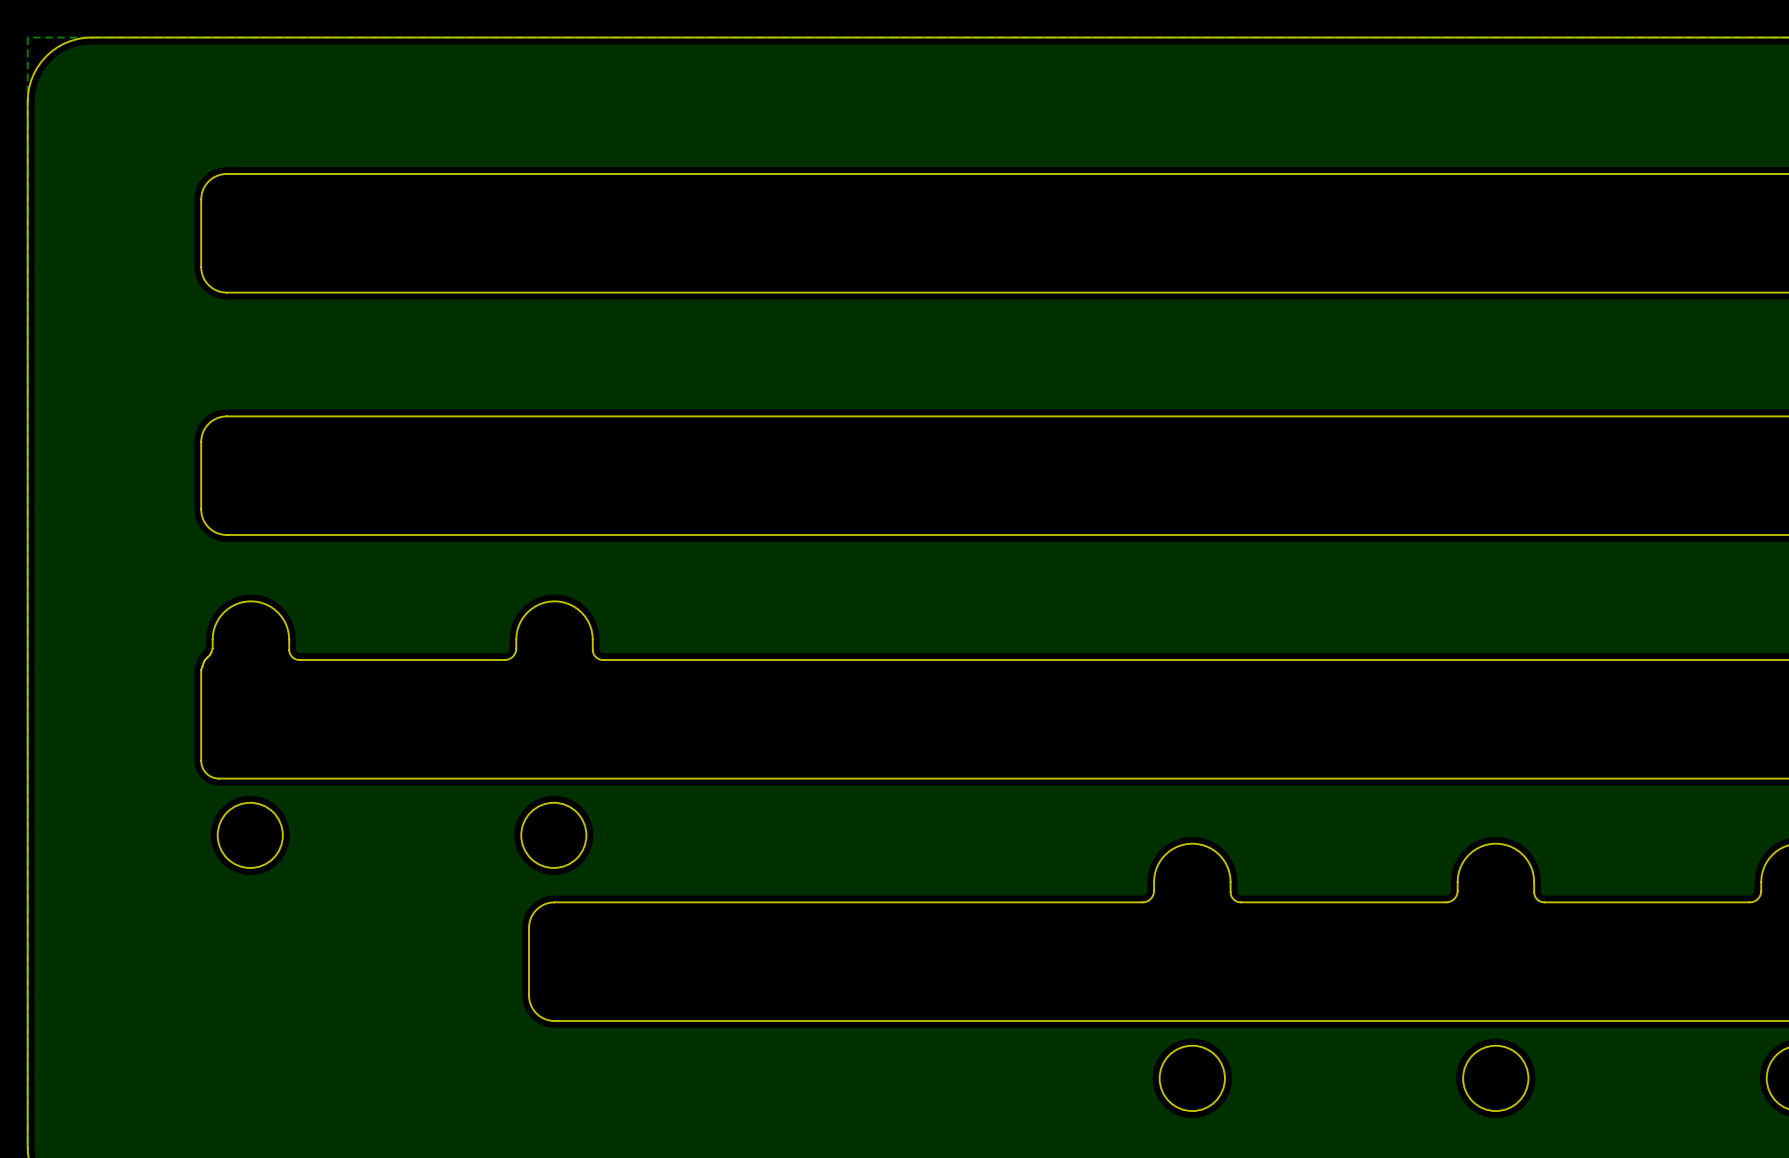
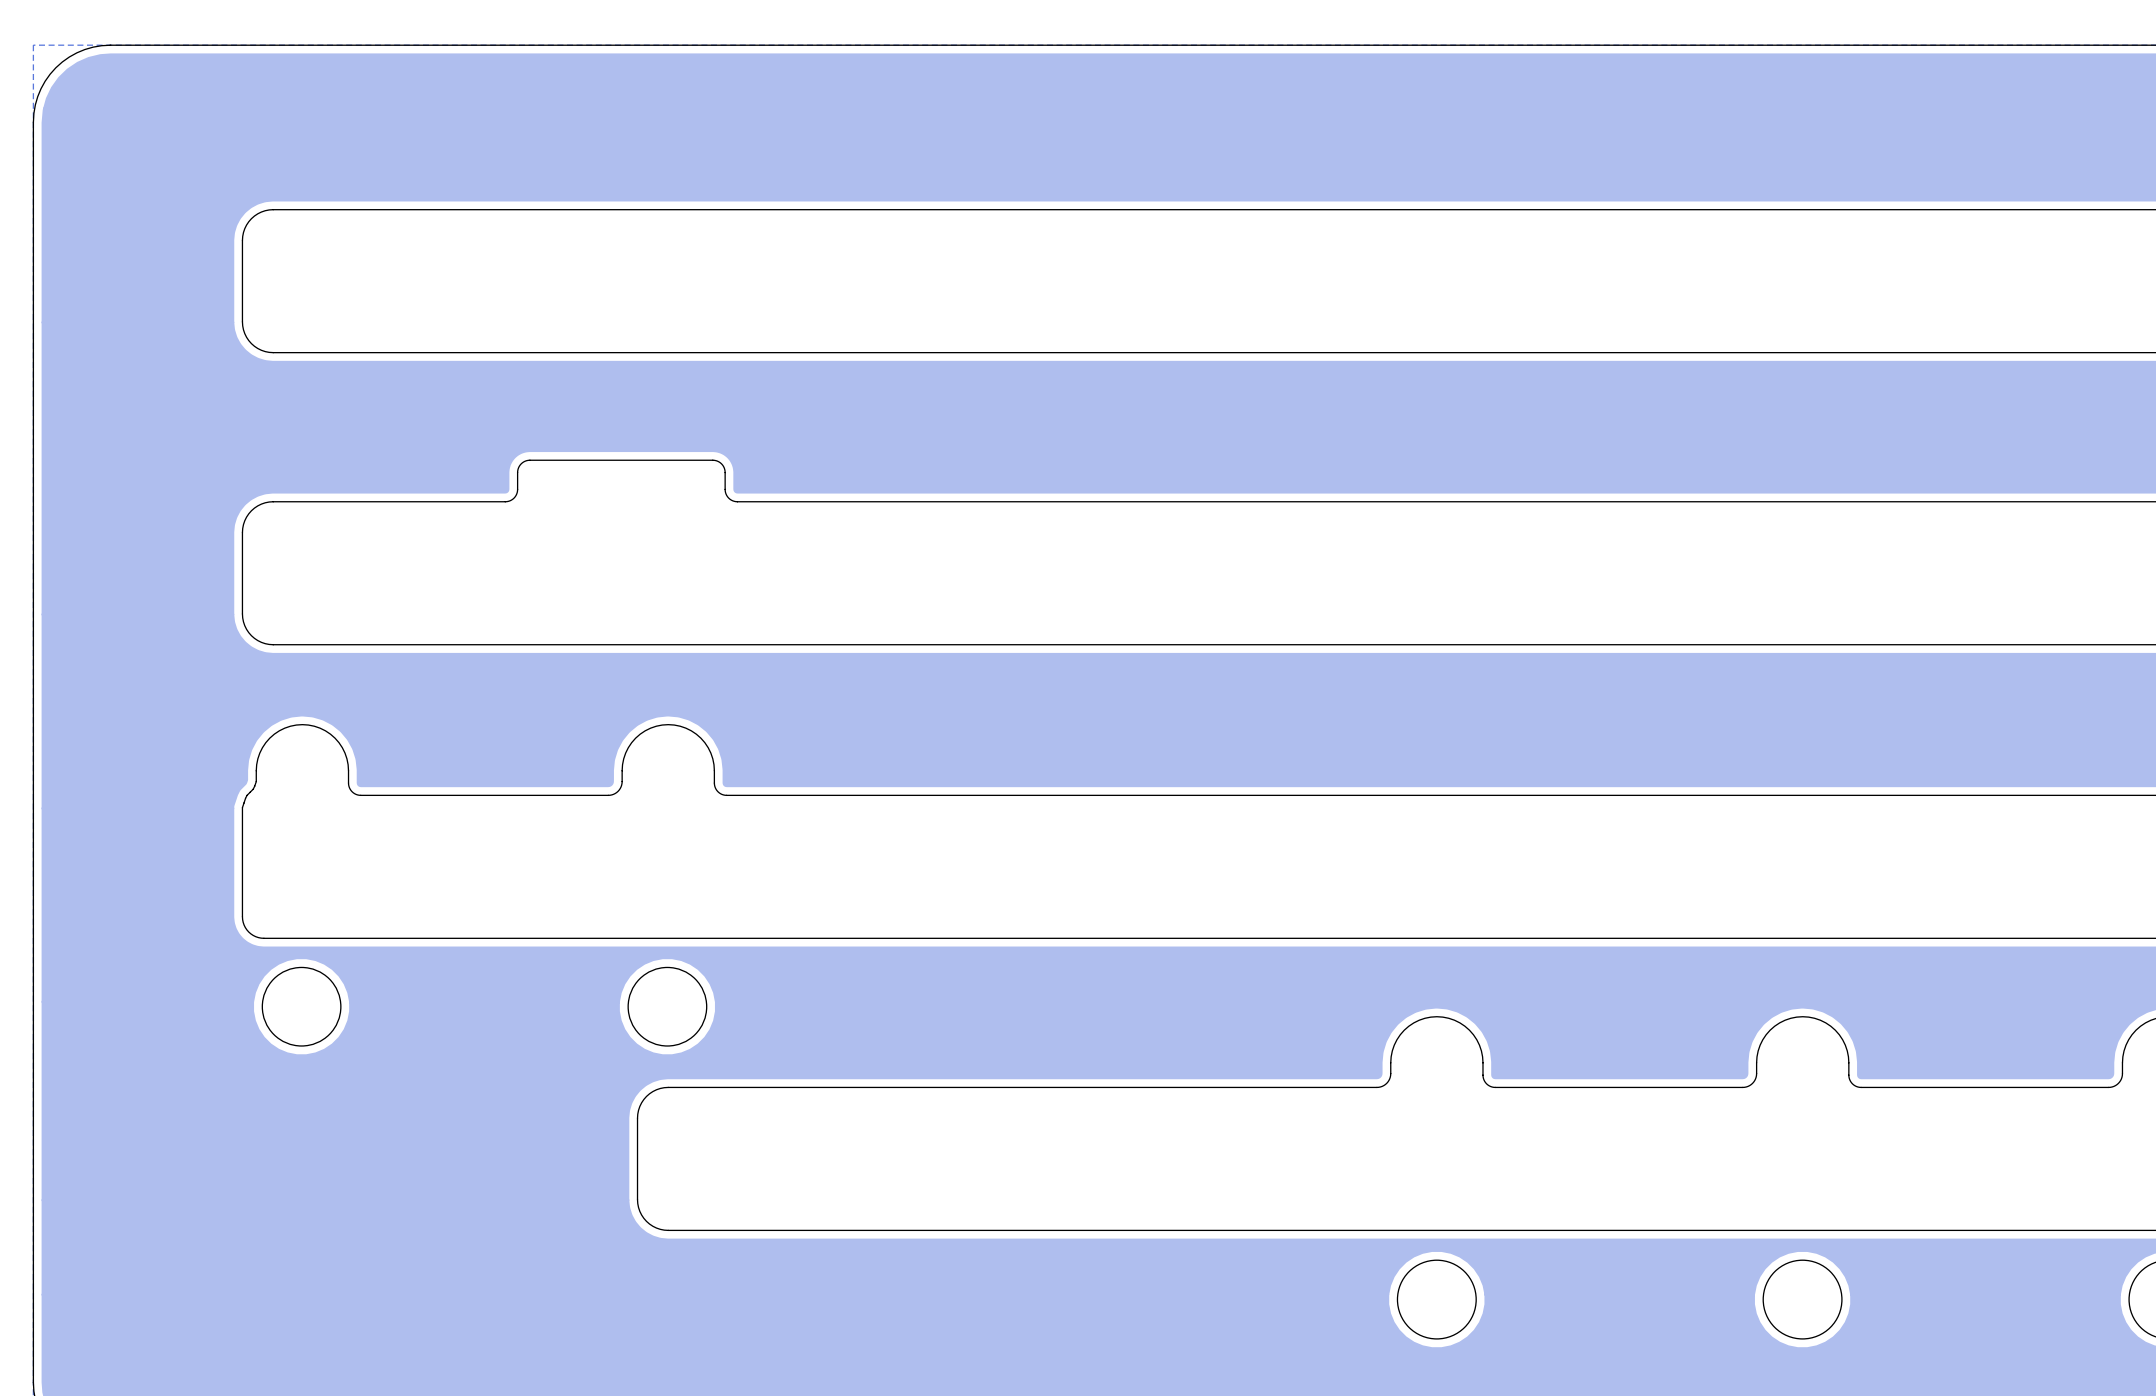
board edge: (419, 416) (611, 416) -> (505, 501) (511, 500) (515, 495) (518, 467) (523, 461) (529, 460) (716, 460) (721, 463) (724, 469) (726, 495) (731, 500) (737, 501)

